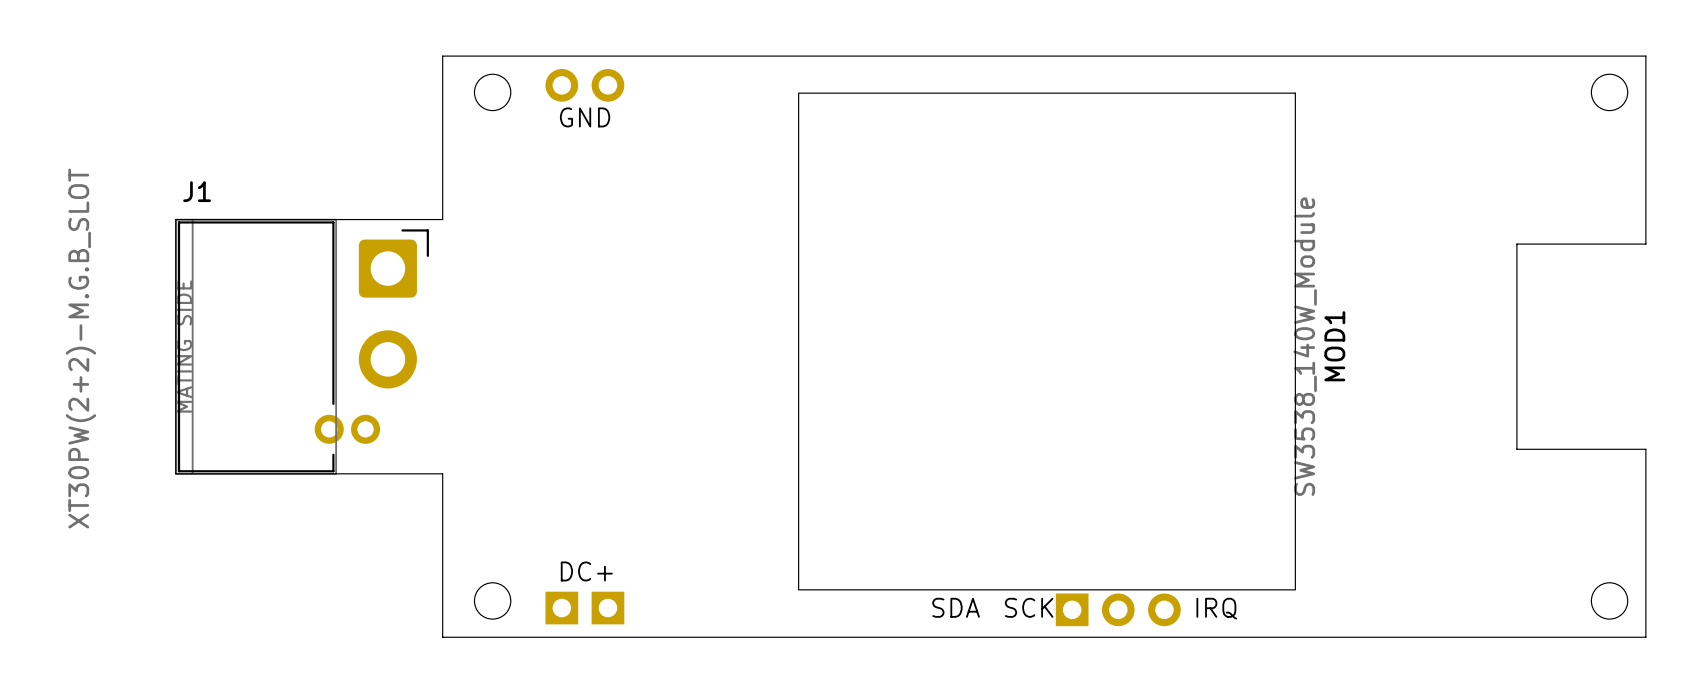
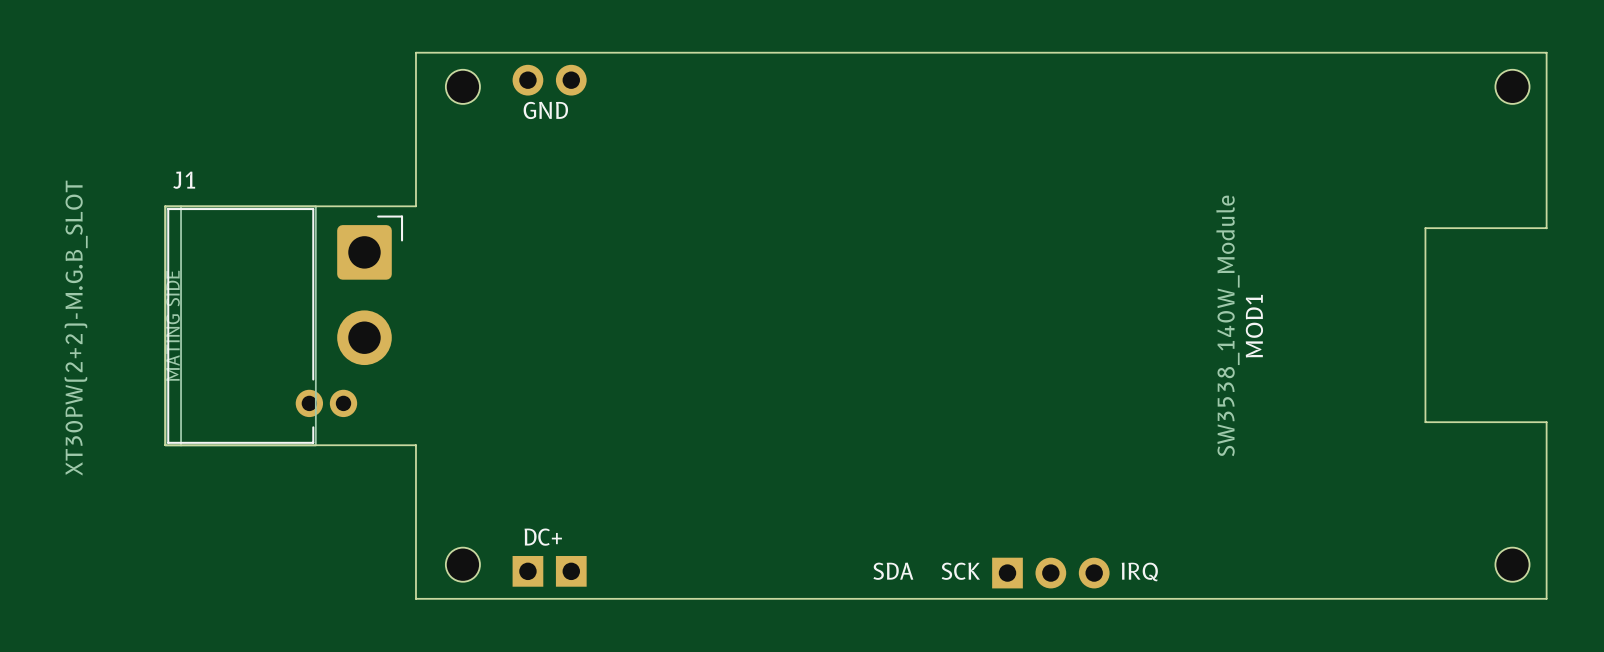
MOD1 footprint: [474, 68, 1647, 627] -> [445, 64, 1530, 589]
board edge: (1645, 242) (1645, 244) -> (1546, 228) (1425, 228) (1425, 422) (1546, 422)

